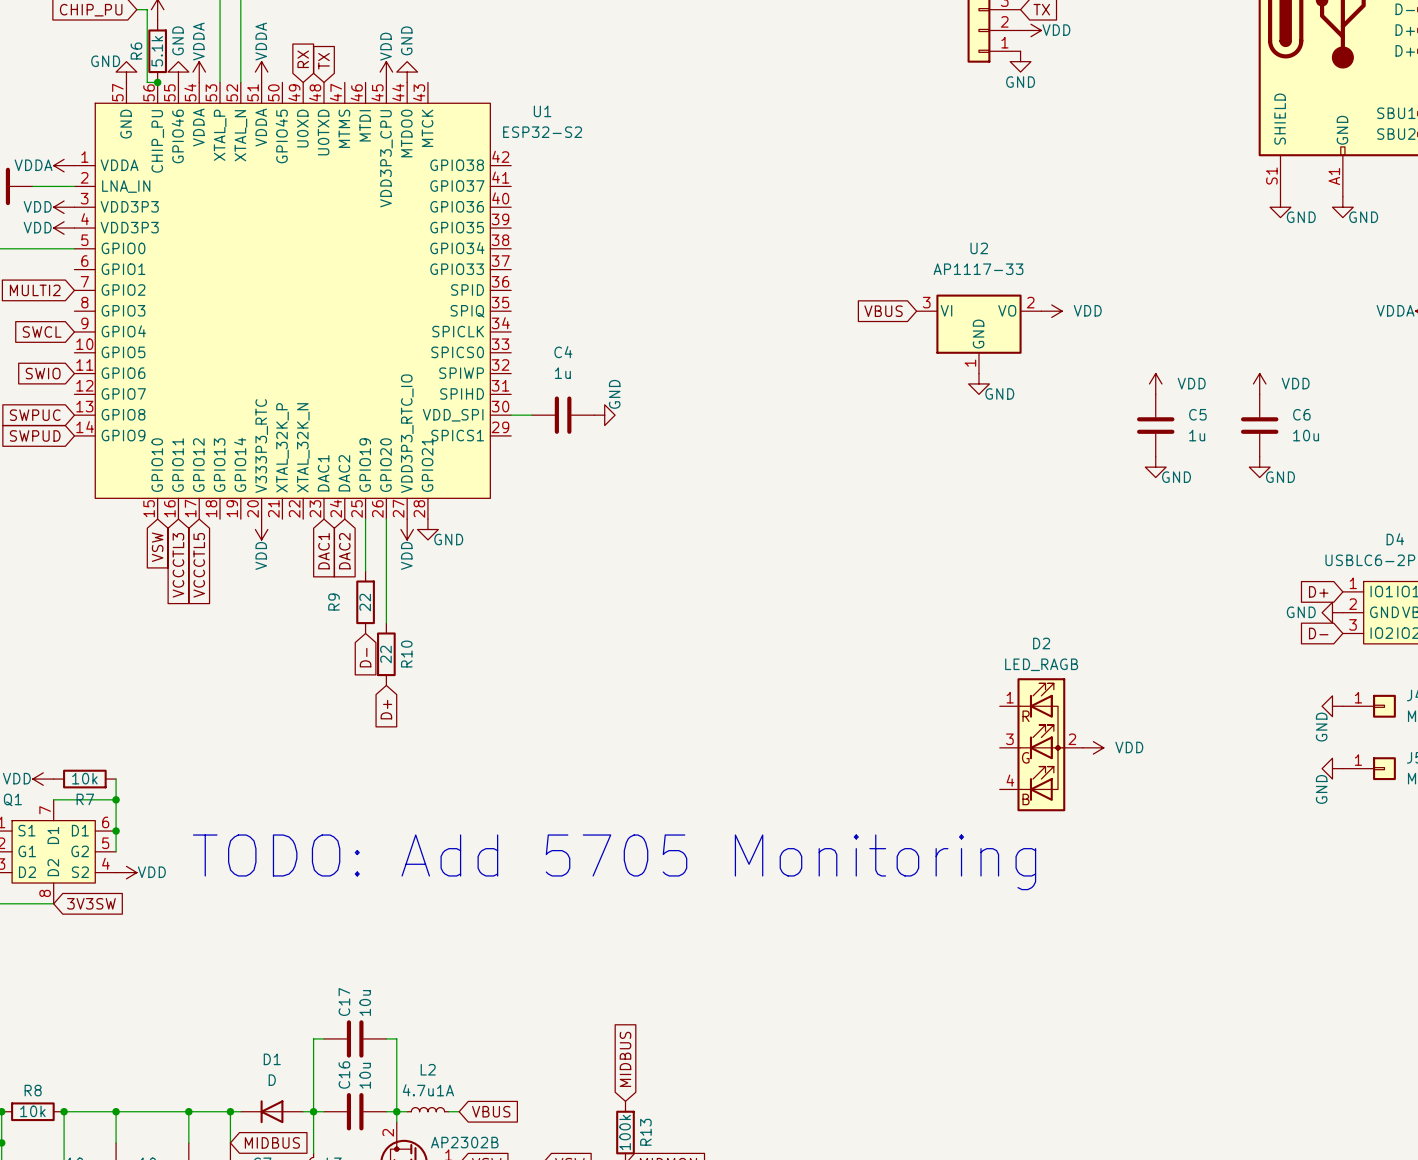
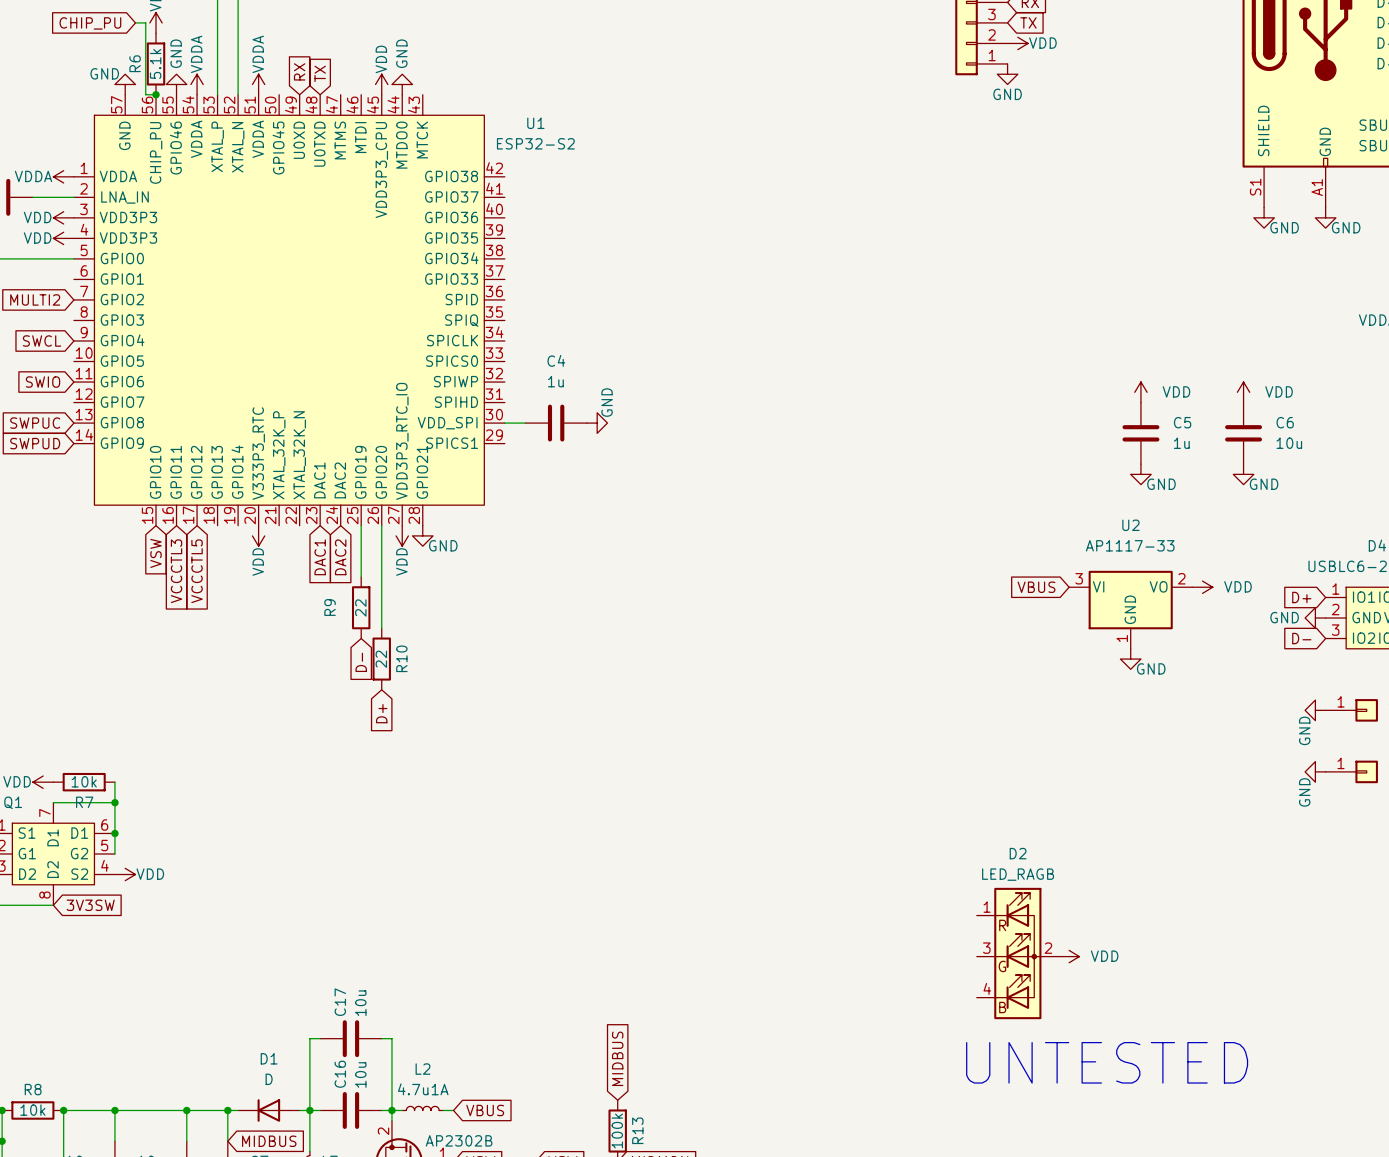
global label: VBUS (883, 311) -> none
power symbol: VDD (1051, 311) -> none
U2 position: (978, 334) -> (1130, 609)
power symbol: GND (978, 383) -> none
global label: none -> VBUS (1036, 587)
power symbol: none -> VDD (1202, 587)
power symbol: none -> GND (1130, 659)
D2 position: (1041, 744) -> (1017, 953)
power symbol: VDD (1093, 747) -> none
text: TODO: Add 5705 Monitoring (614, 862) -> none
power symbol: none -> VDD (1069, 956)
text: none -> UNTESTED (1107, 1062)

